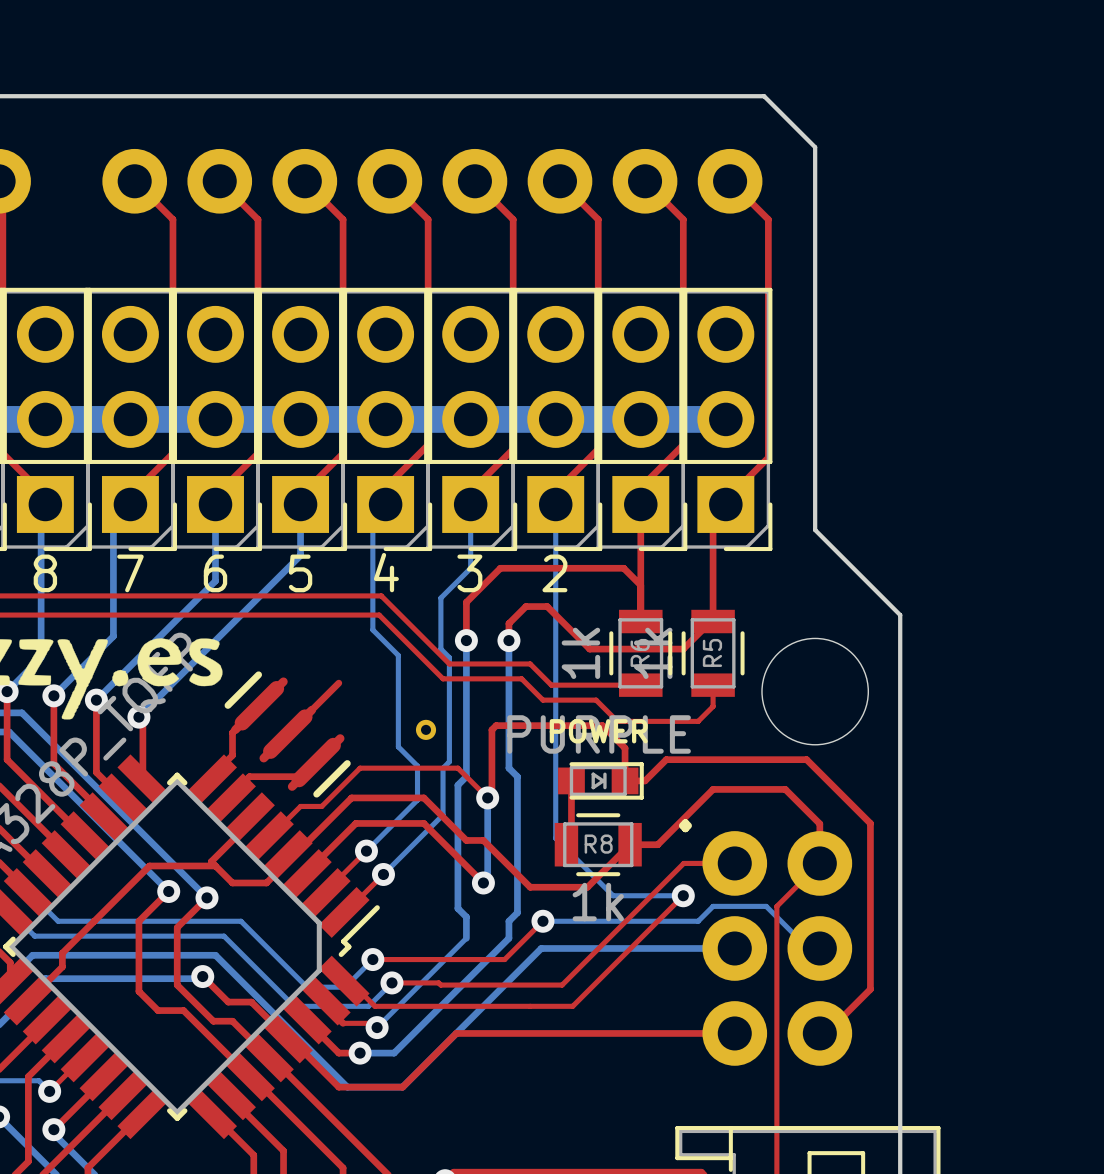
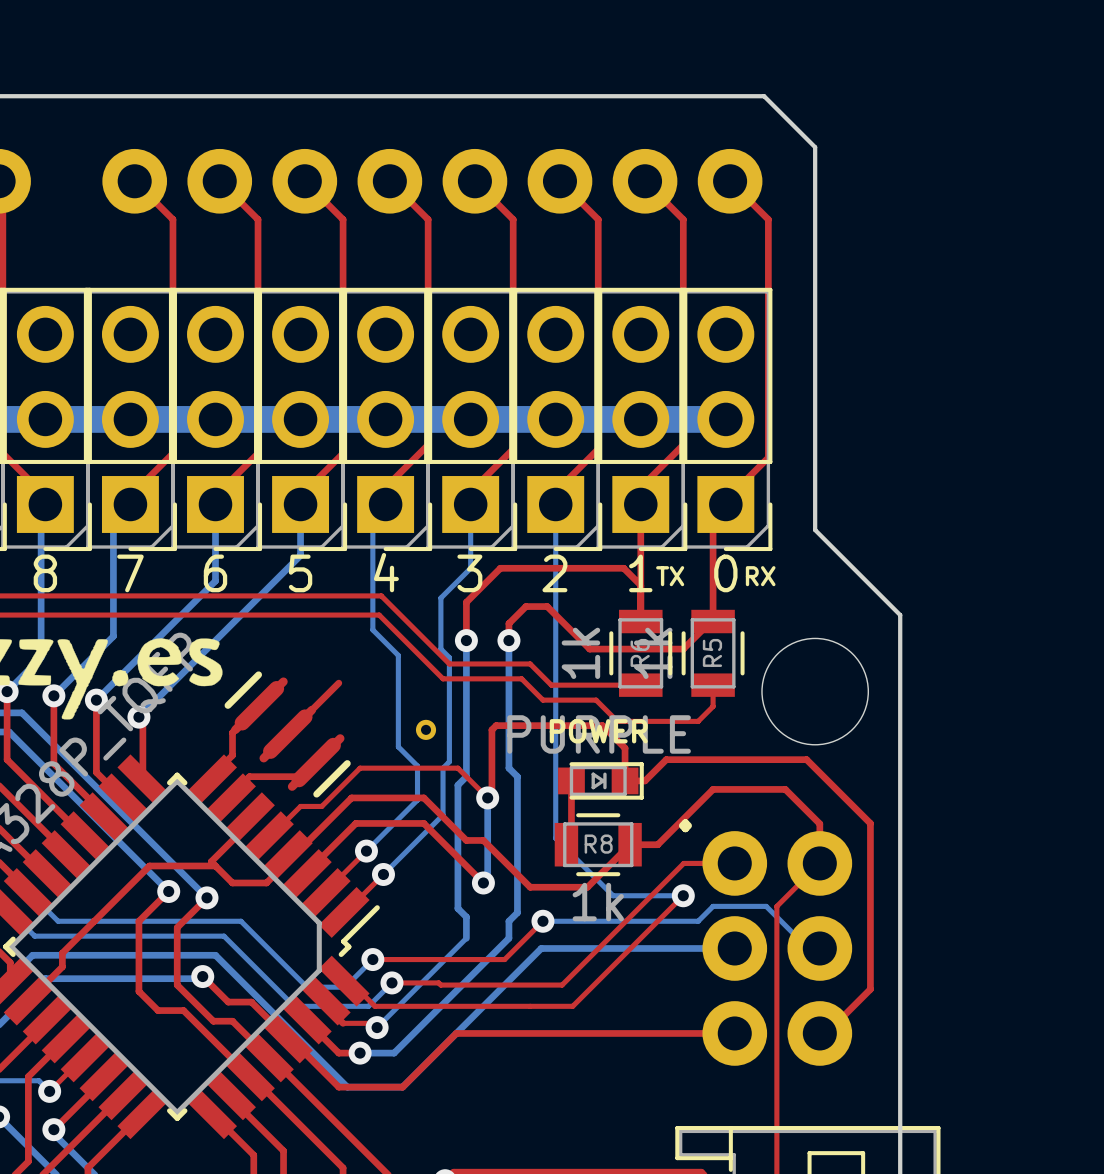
text: none -> 1 (640, 573)
text: none -> 0 (725, 573)
text: none -> TX (670, 576)
text: none -> RX (760, 576)

